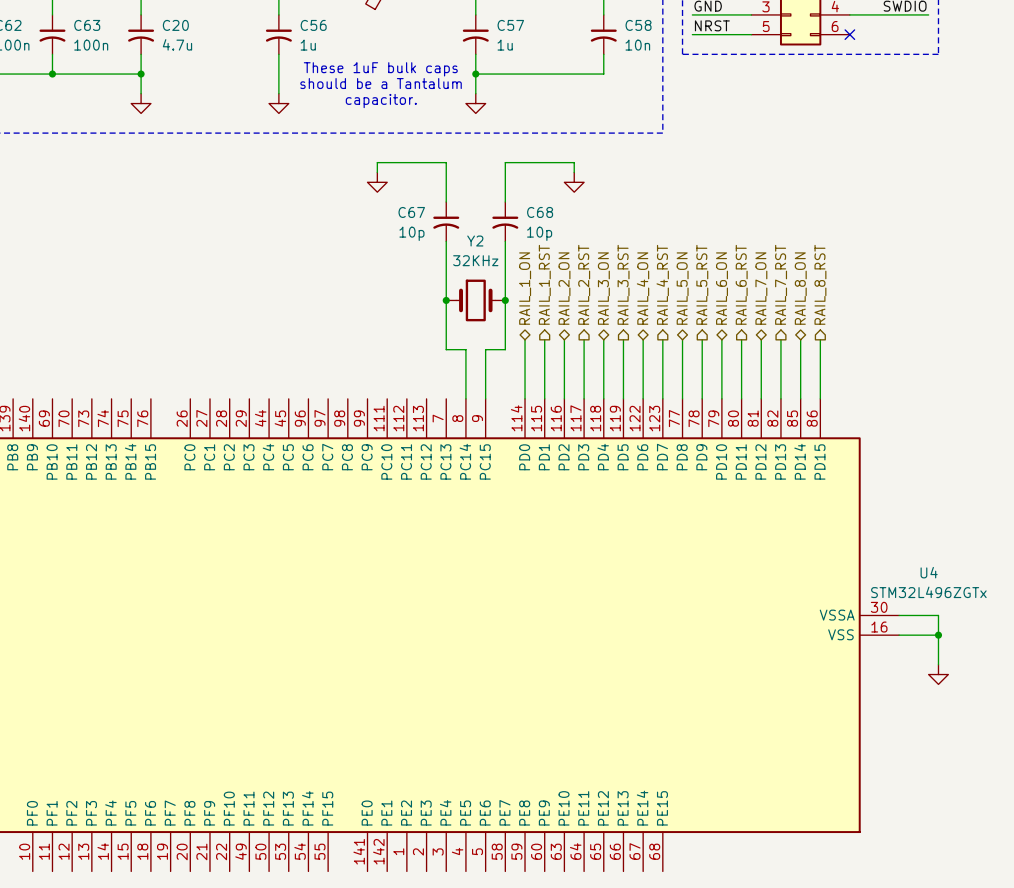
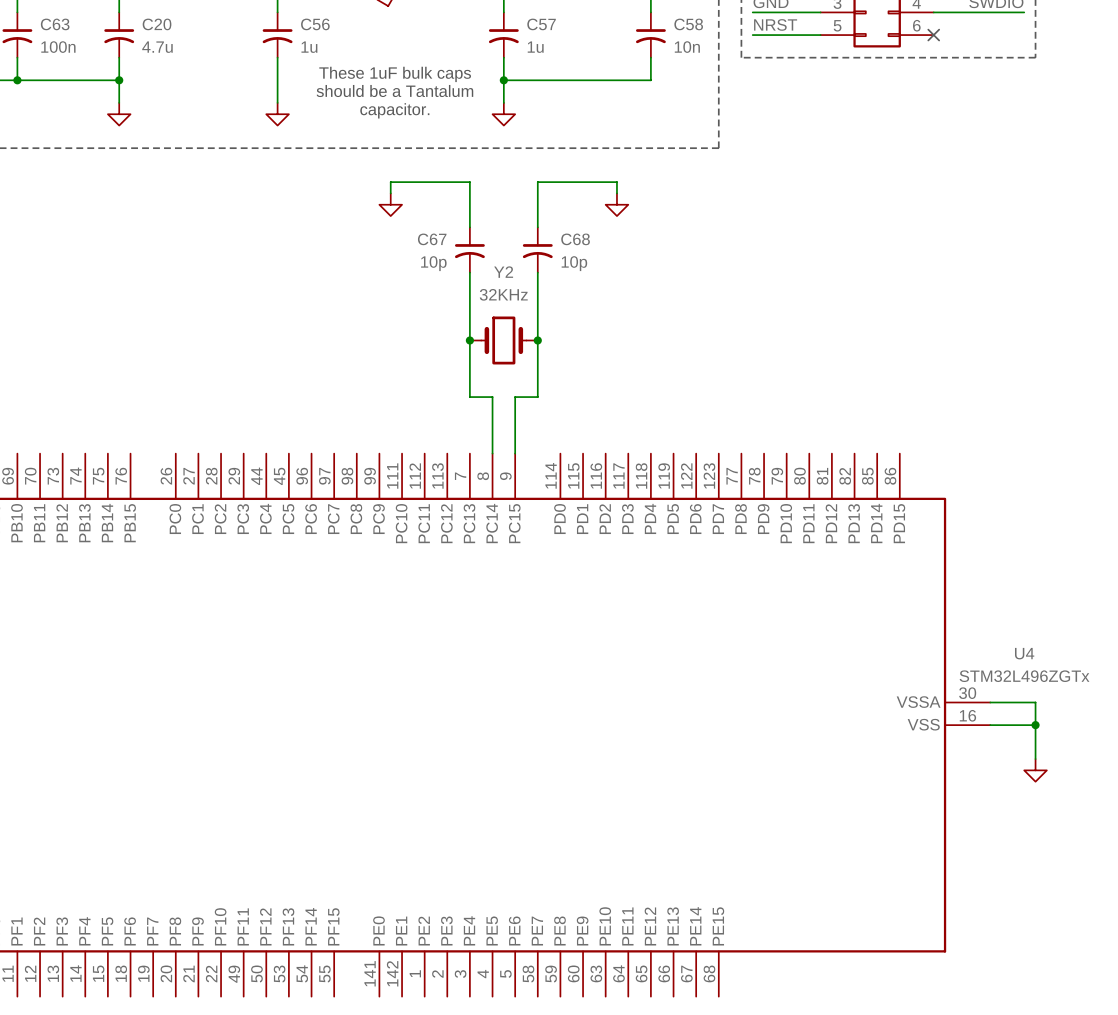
hierarchical label: RAIL_1_RST (544, 284) -> none
hierarchical label: RAIL_2_RST (584, 284) -> none
hierarchical label: RAIL_3_RST (623, 284) -> none
hierarchical label: RAIL_4_RST (662, 284) -> none
hierarchical label: RAIL_5_RST (702, 284) -> none
hierarchical label: RAIL_6_RST (741, 284) -> none
hierarchical label: RAIL_7_RST (781, 284) -> none
hierarchical label: RAIL_8_RST (820, 284) -> none
hierarchical label: RAIL_1_ON (525, 288) -> none
hierarchical label: RAIL_2_ON (564, 288) -> none
hierarchical label: RAIL_3_ON (603, 288) -> none
hierarchical label: RAIL_4_ON (643, 288) -> none
hierarchical label: RAIL_5_ON (682, 288) -> none
hierarchical label: RAIL_6_ON (722, 288) -> none
hierarchical label: RAIL_7_ON (761, 288) -> none
hierarchical label: RAIL_8_ON (800, 288) -> none
wire: (525, 339) (525, 398) -> none
wire: (544, 339) (544, 398) -> none
wire: (564, 339) (564, 398) -> none
wire: (584, 339) (584, 398) -> none
wire: (603, 339) (603, 398) -> none
wire: (623, 339) (623, 398) -> none
wire: (643, 339) (643, 398) -> none
wire: (662, 339) (662, 398) -> none
wire: (682, 339) (682, 398) -> none
wire: (702, 339) (702, 398) -> none
wire: (721, 339) (721, 398) -> none
wire: (741, 339) (741, 398) -> none
wire: (761, 339) (761, 398) -> none
wire: (780, 339) (780, 398) -> none
wire: (800, 339) (800, 398) -> none
wire: (820, 339) (820, 398) -> none

